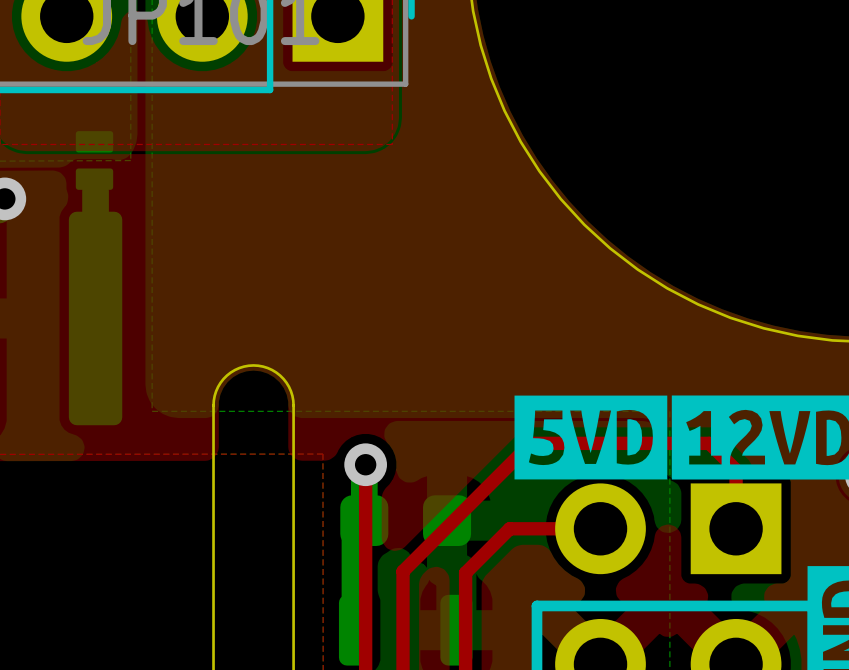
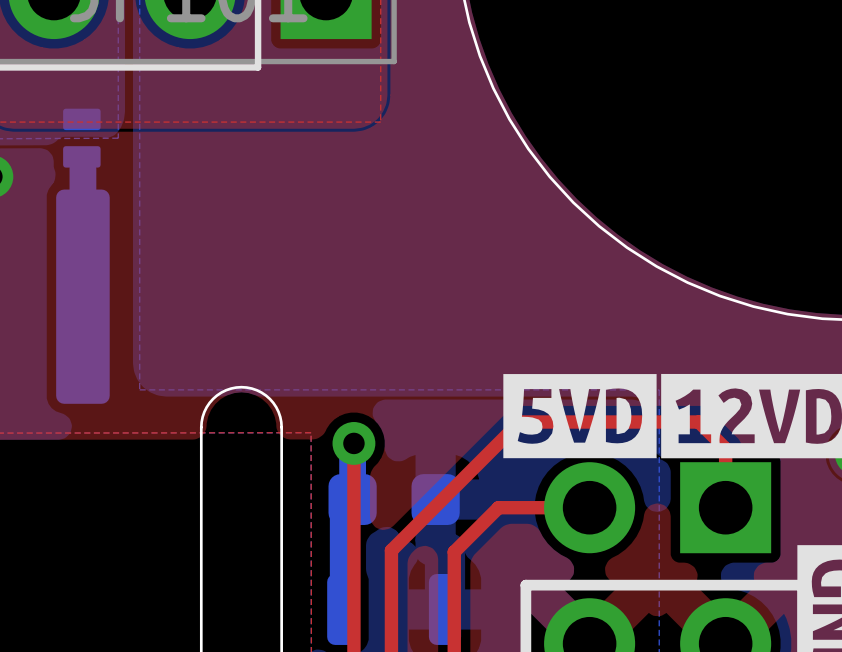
board edge: (213, 448) (213, 400) (218, 386) (230, 372) (239, 368) (253, 365) (267, 368) (276, 372) (289, 386) (293, 400) (293, 448) -> (201, 427) (204, 411) (213, 398) (226, 390) (241, 387) (256, 390) (269, 398) (278, 411) (281, 427)

